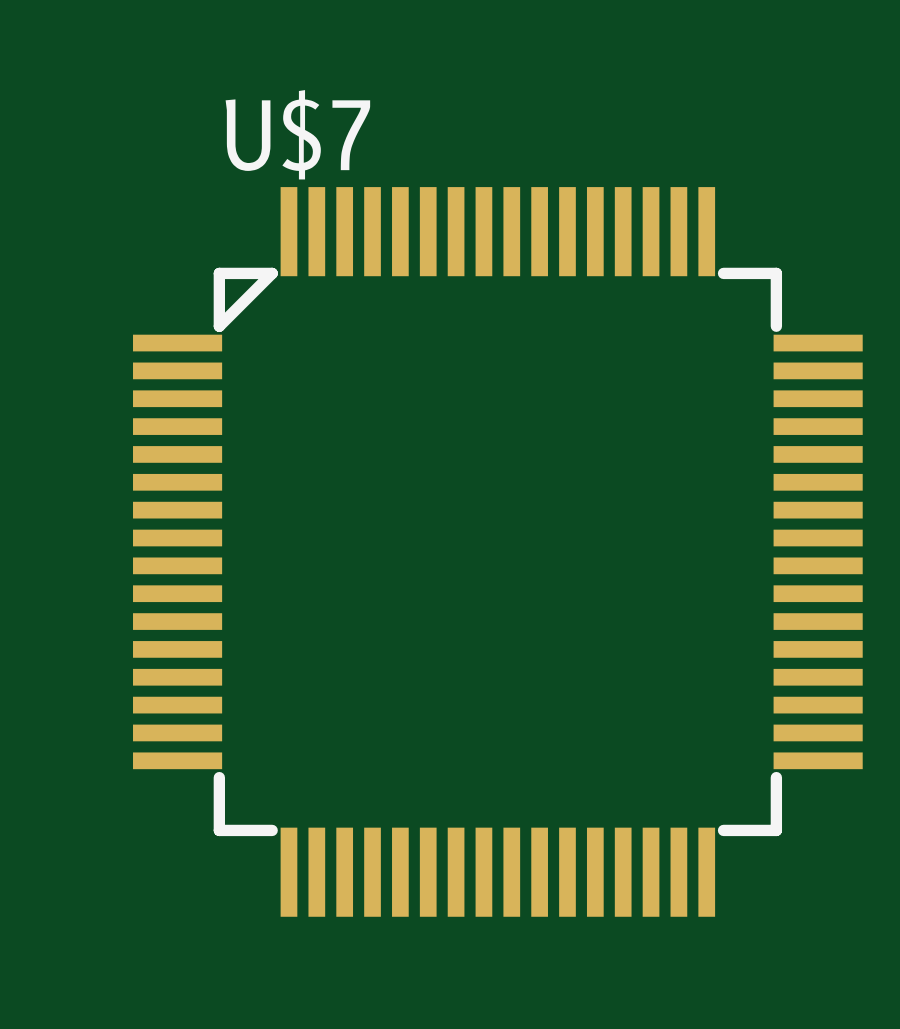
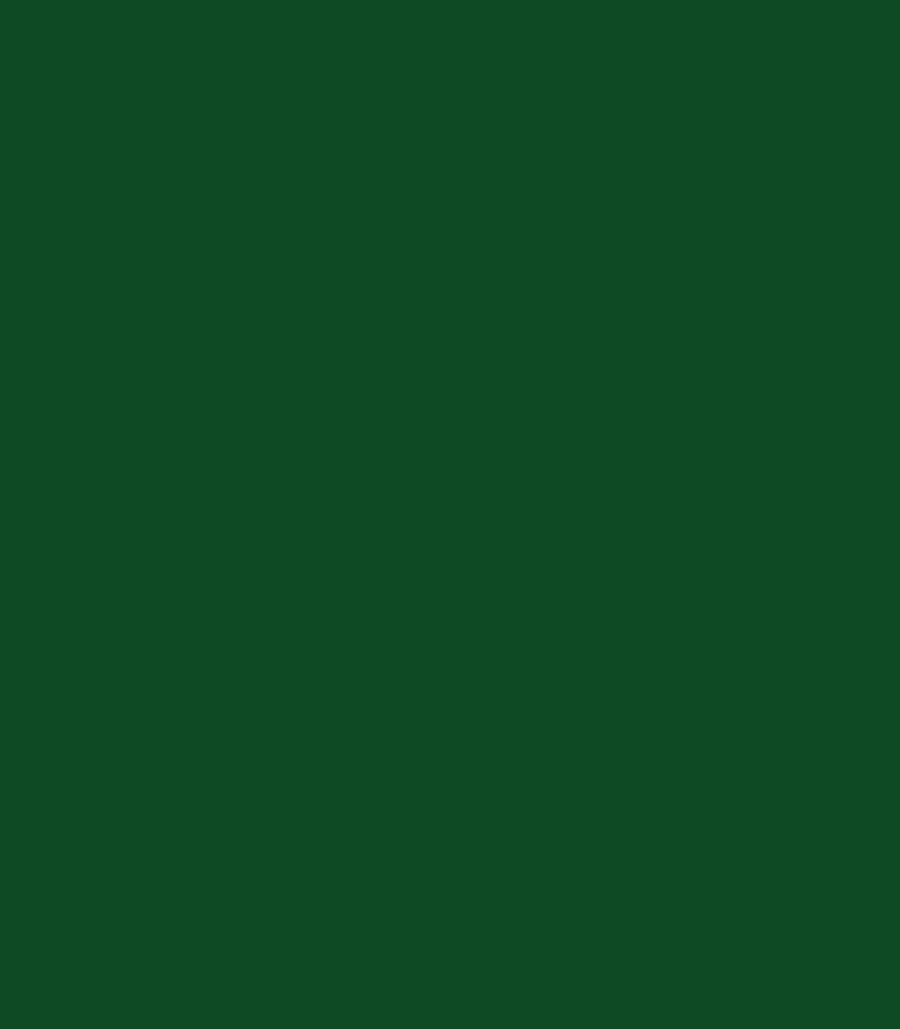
U$7: (497, 551) -> none

